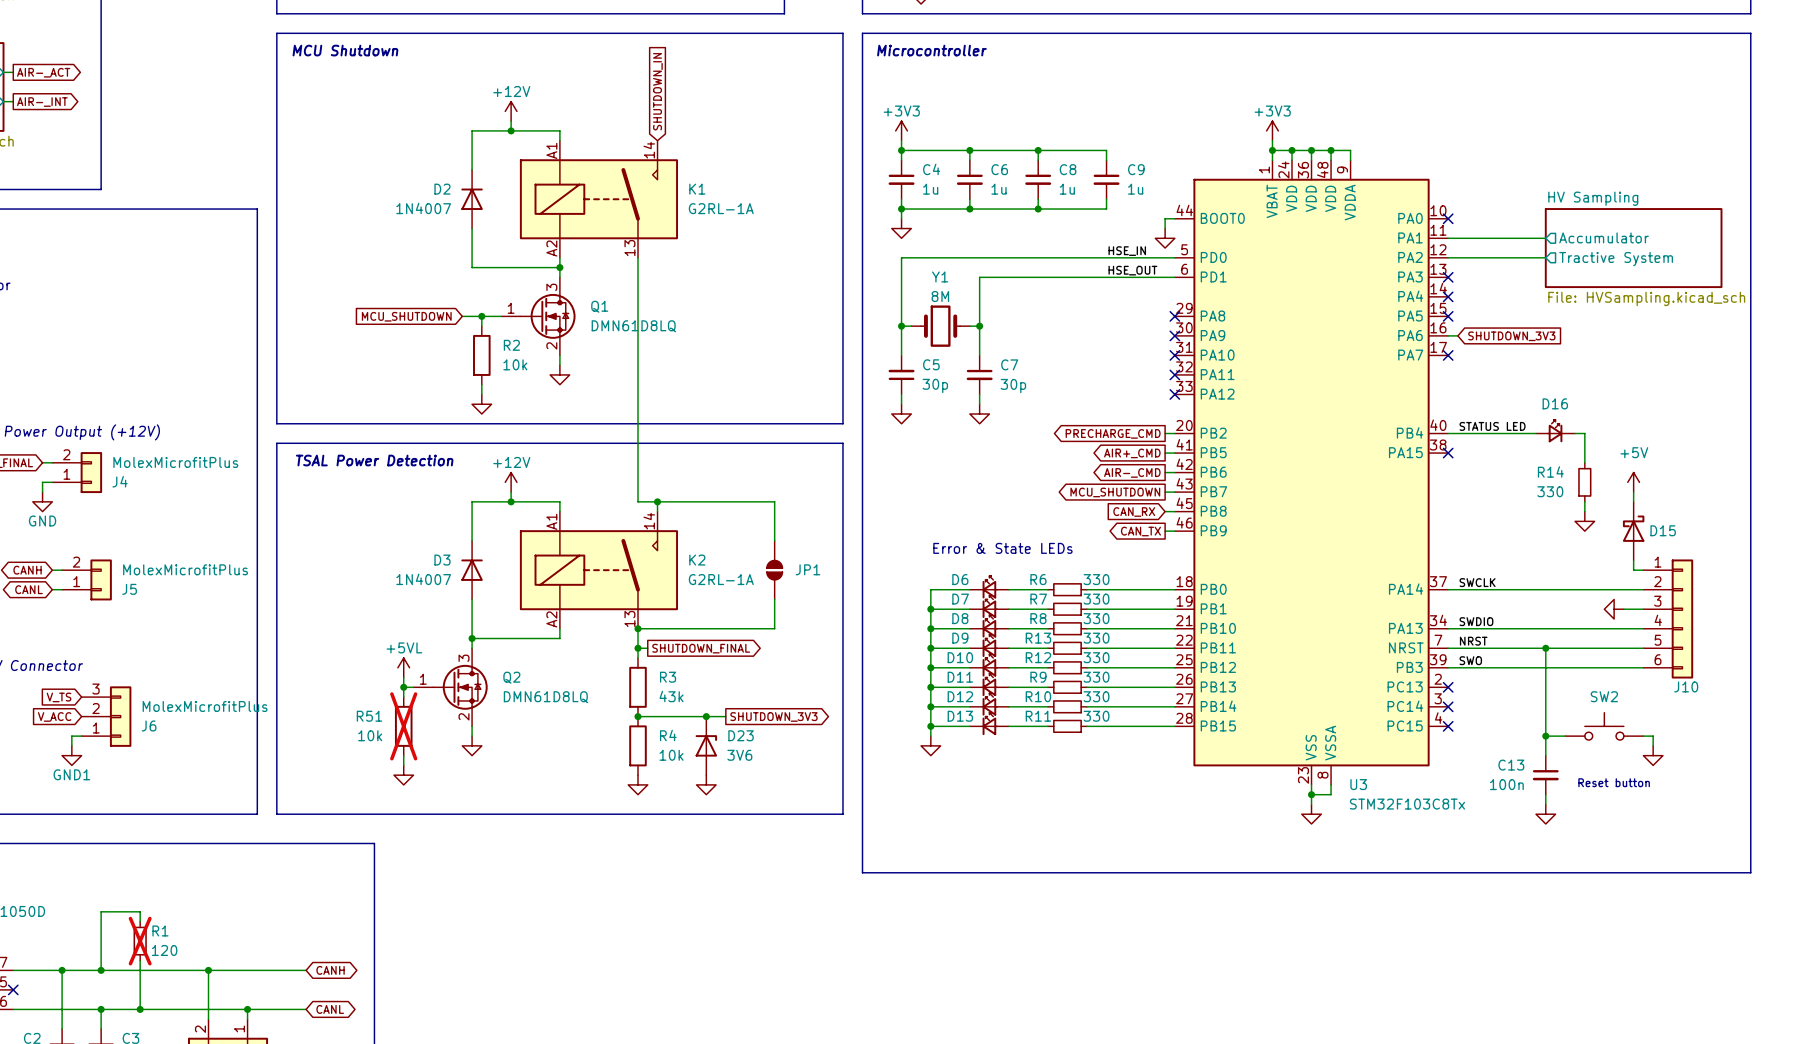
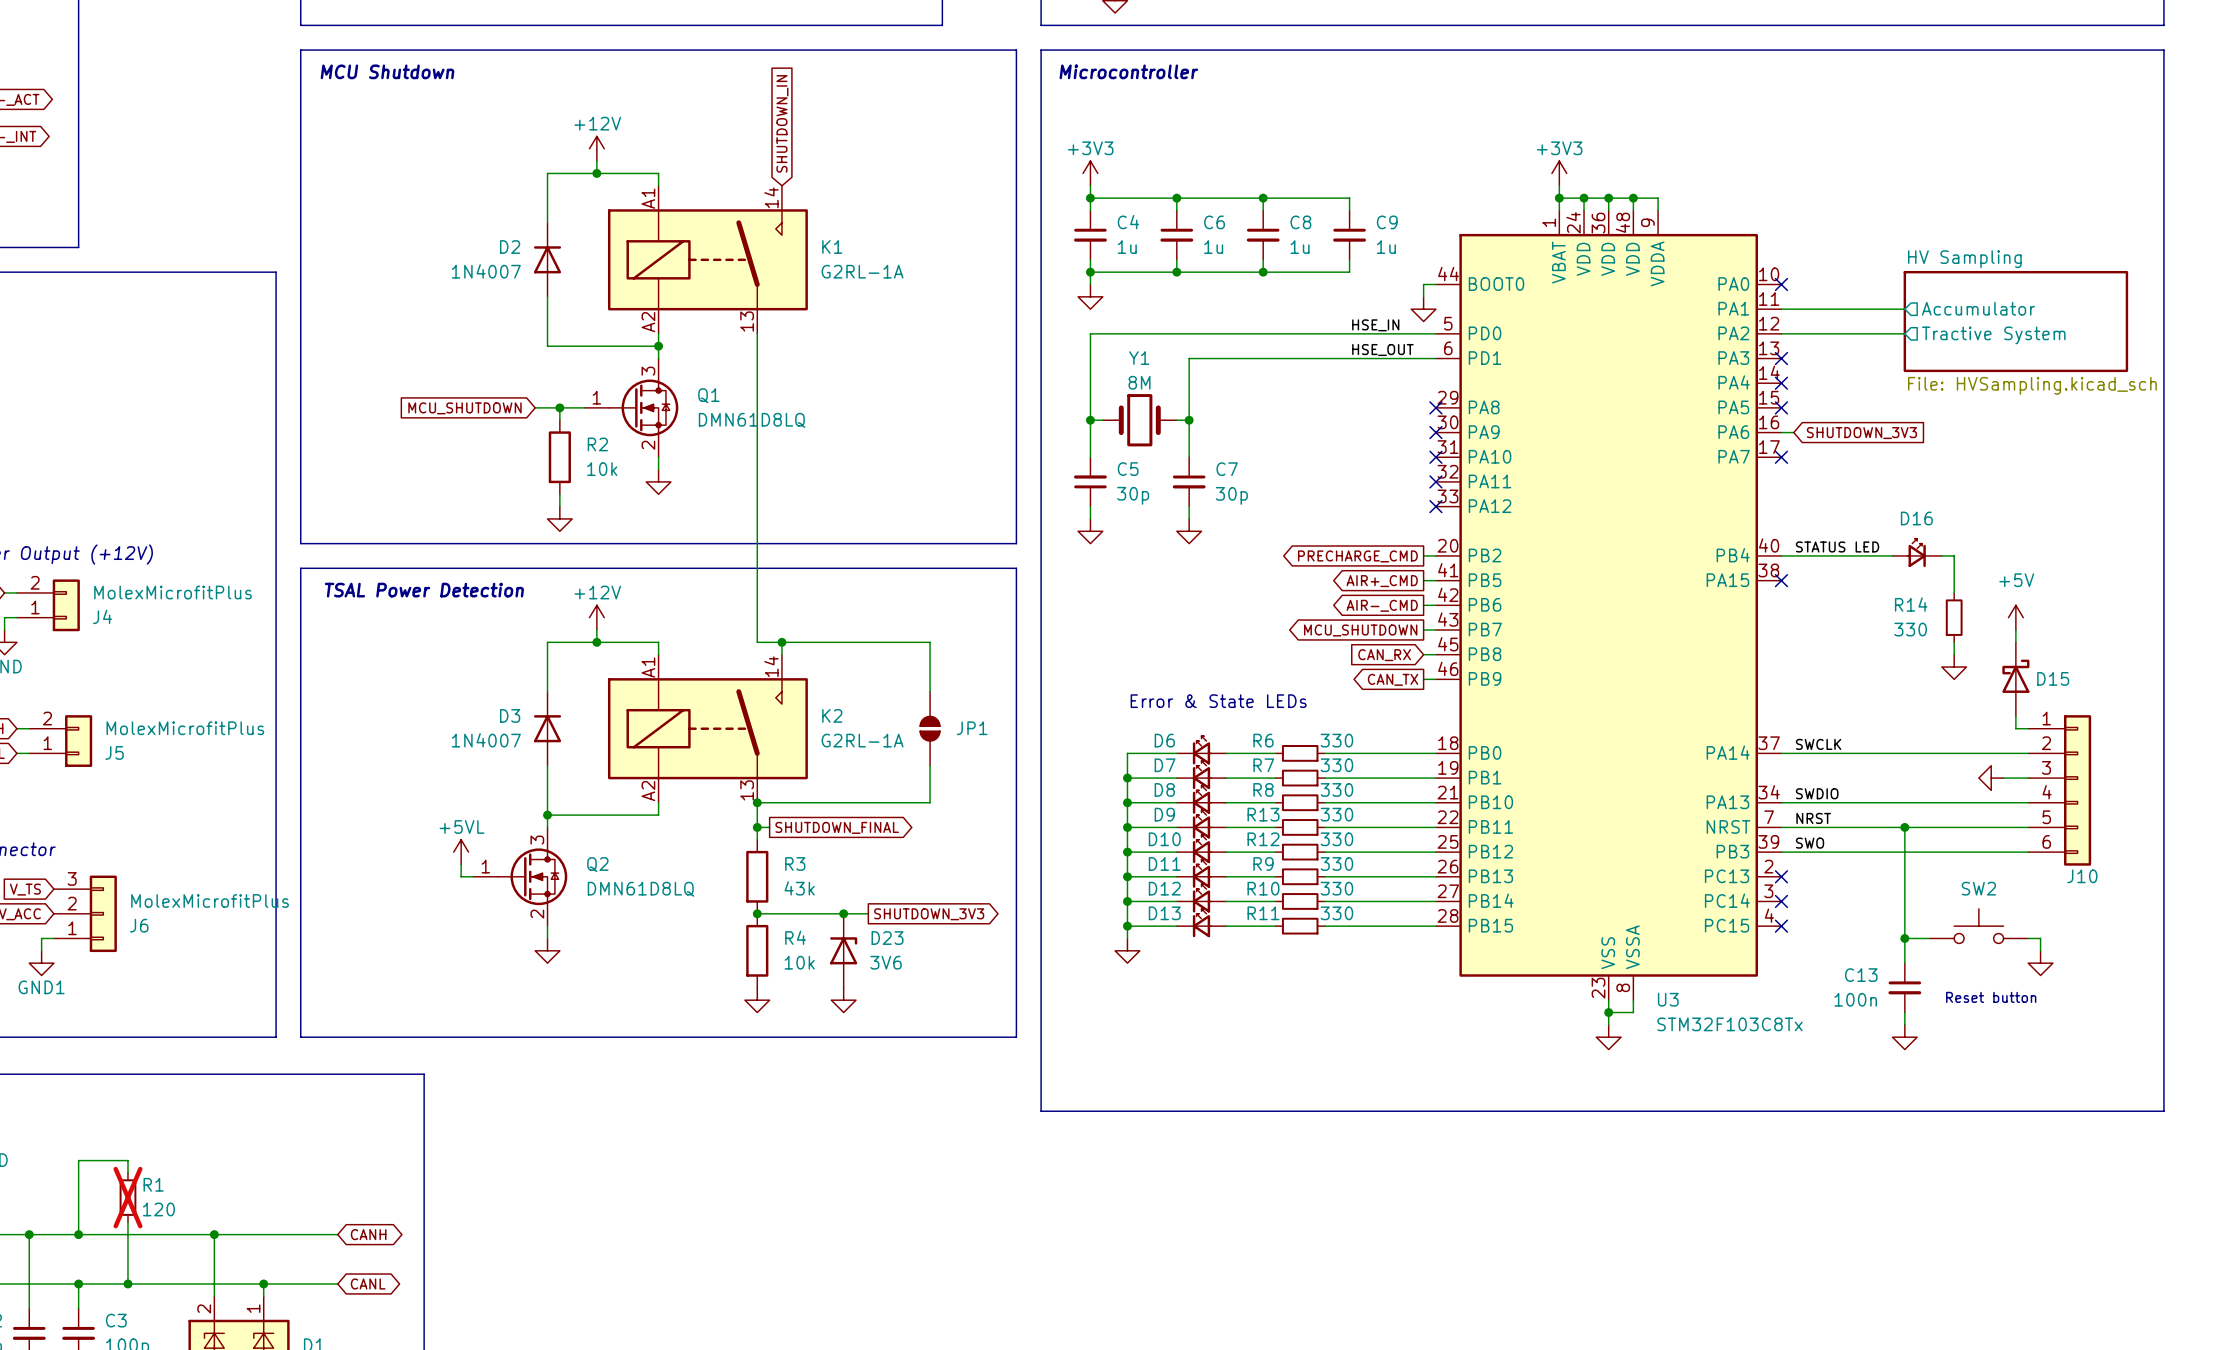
wire: (403, 687) (403, 697) -> none
junction: (403, 687) -> none
R51: 10k (403, 726) -> none
wire: (403, 755) (403, 765) -> none
power symbol: (403, 775) -> none

